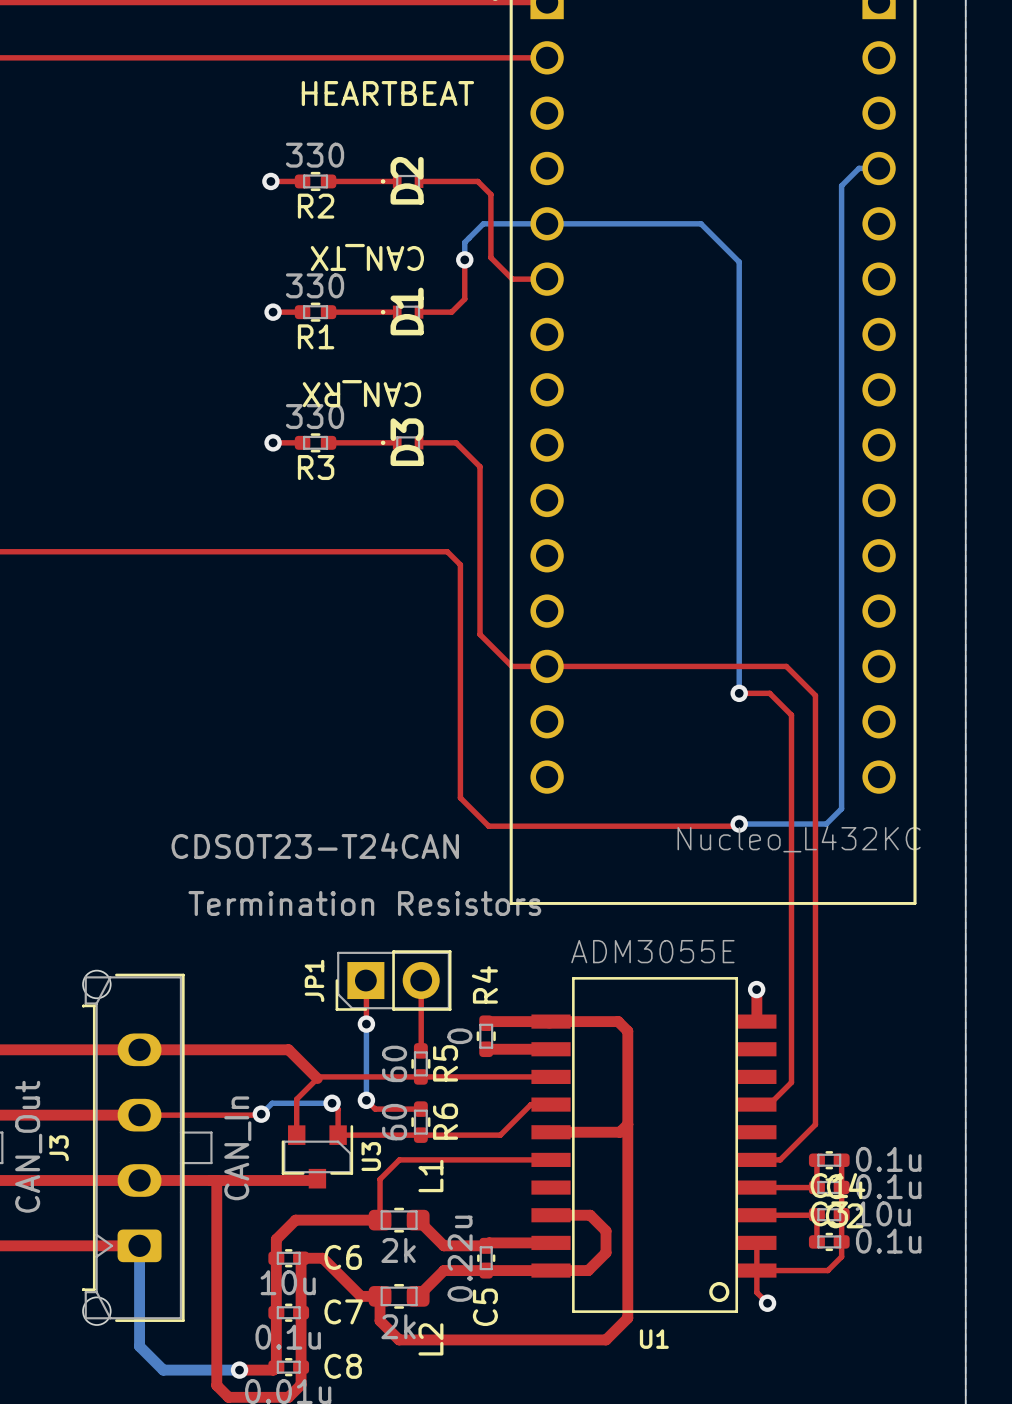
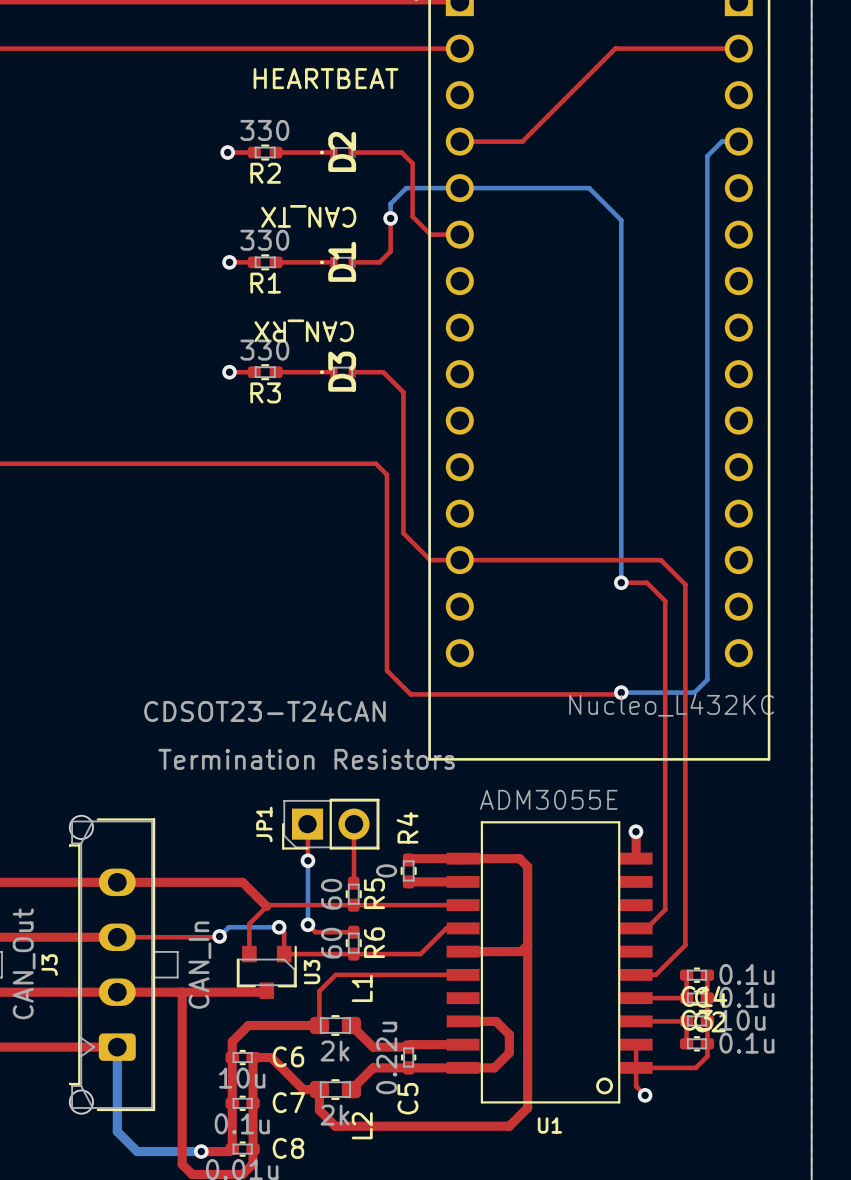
top track: none -> (738, 48) (615, 48) (522, 141) (459, 141)

